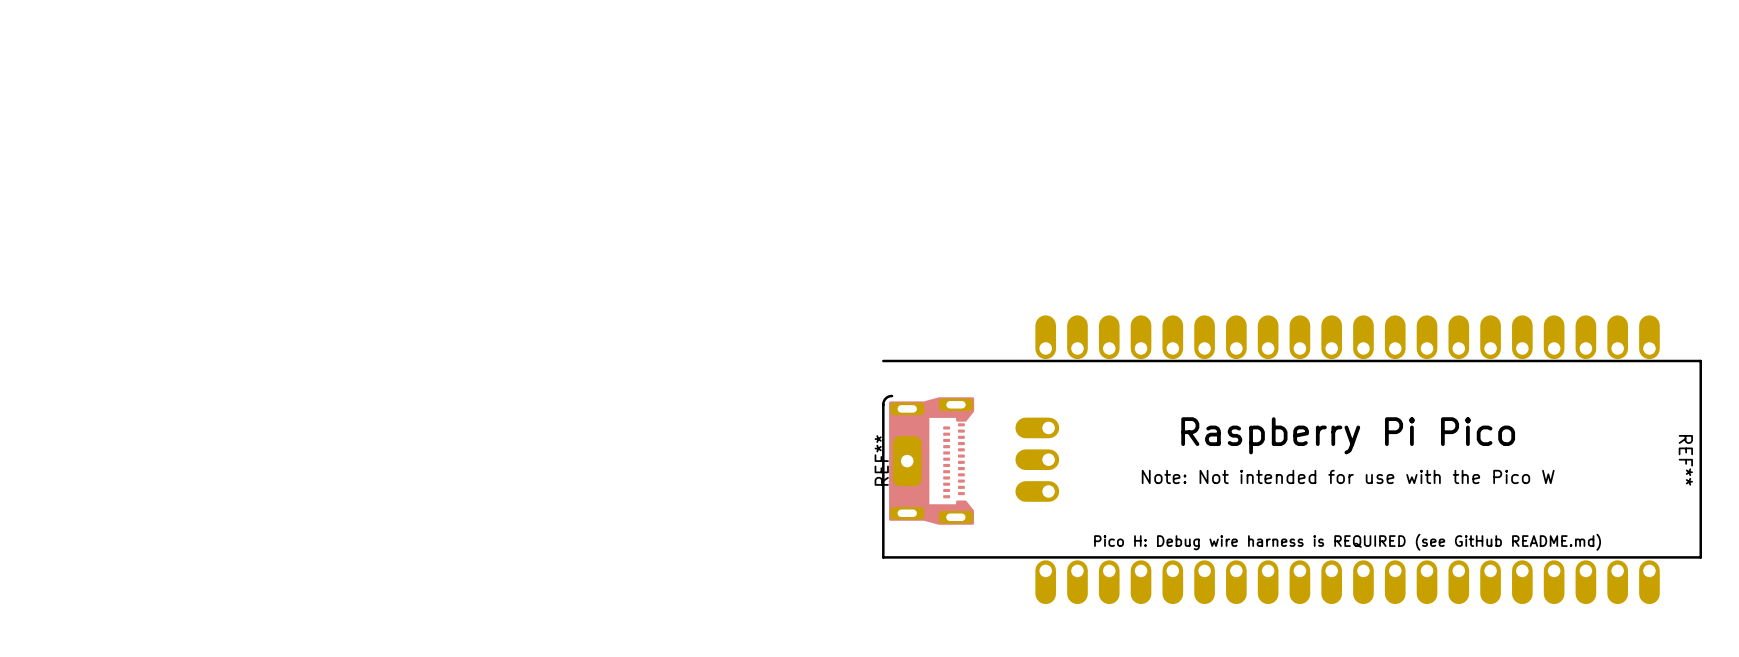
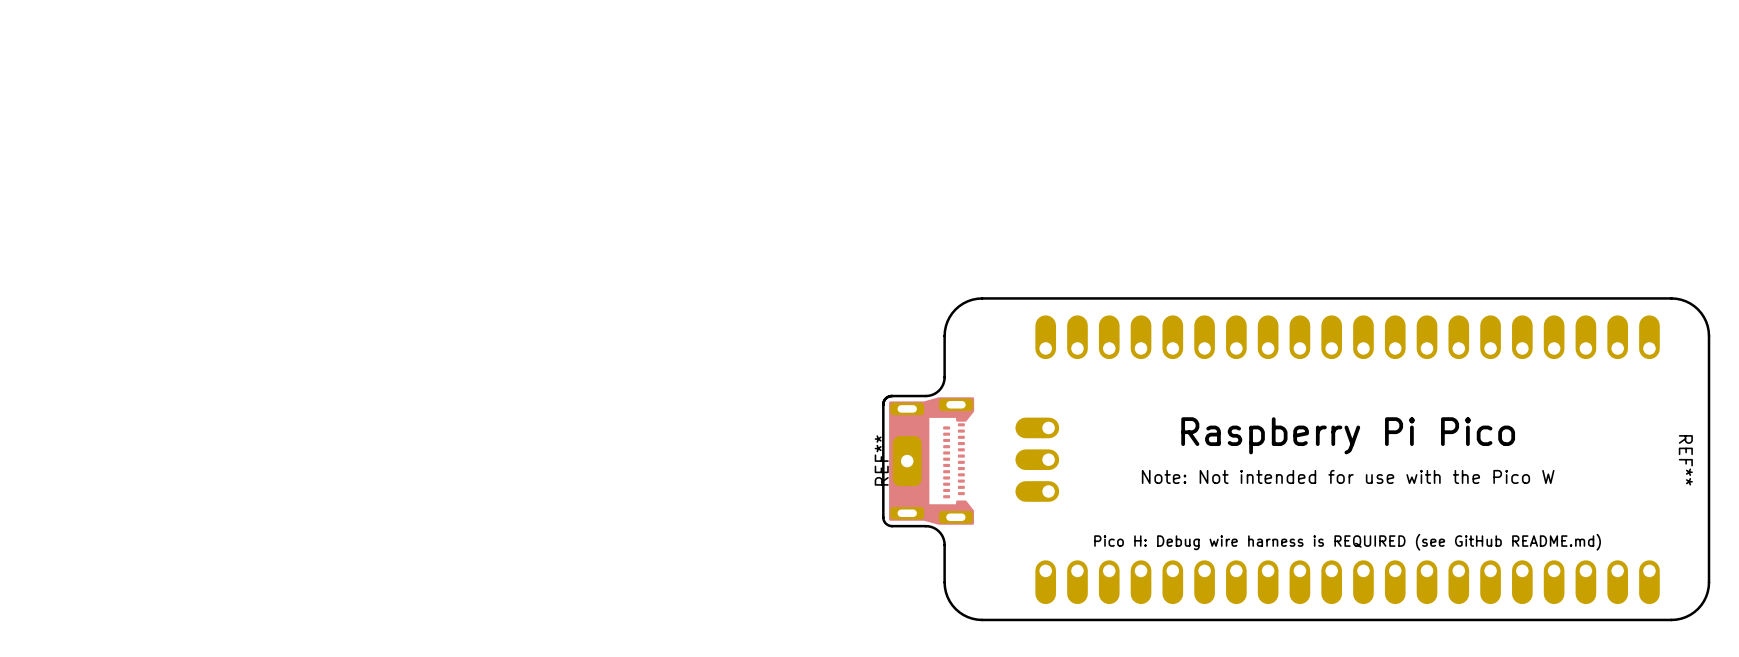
board edge: (883, 361) (1700, 361) (1700, 557) (883, 557) (883, 517) -> (883, 404) (885, 399) (890, 396) (928, 395) (939, 390) (944, 379) (944, 335) (947, 321) (959, 306) (977, 298) (1671, 298) (1685, 301) (1698, 309) (1703, 317) (1708, 331) (1708, 587) (1703, 601) (1698, 608) (1681, 618) (977, 619) (959, 612) (947, 596) (944, 582) (944, 542) (939, 531) (928, 526) (890, 525) (885, 522) (883, 517)

